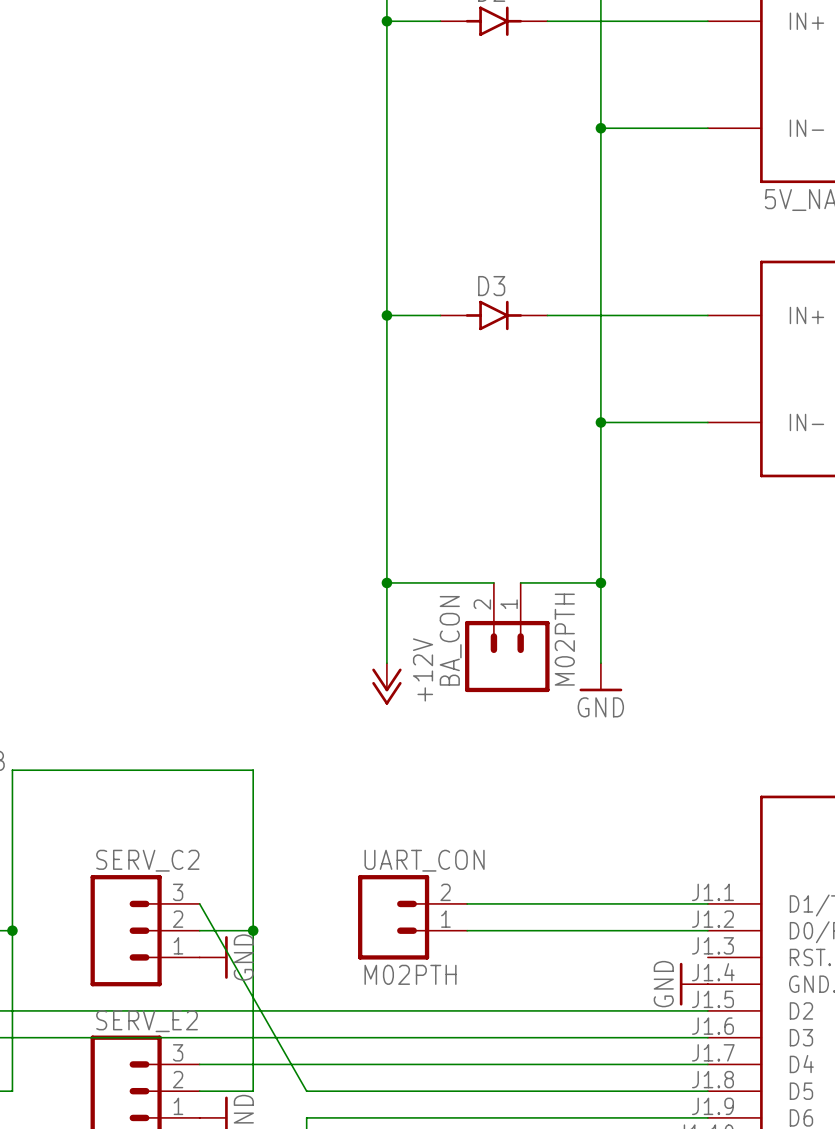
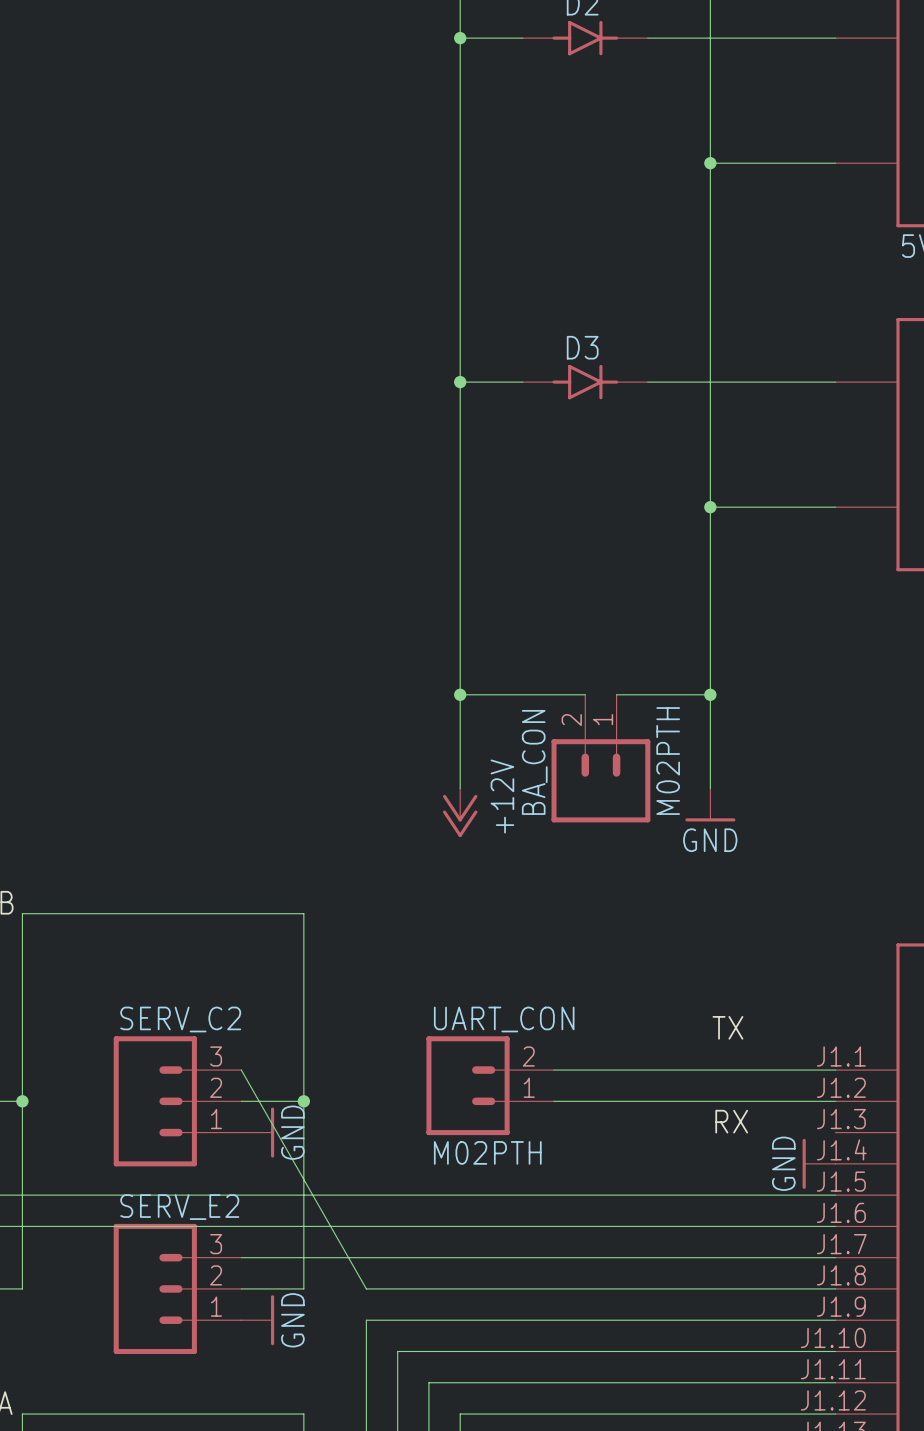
label: none -> TX (727, 1027)
label: none -> RX (731, 1121)

